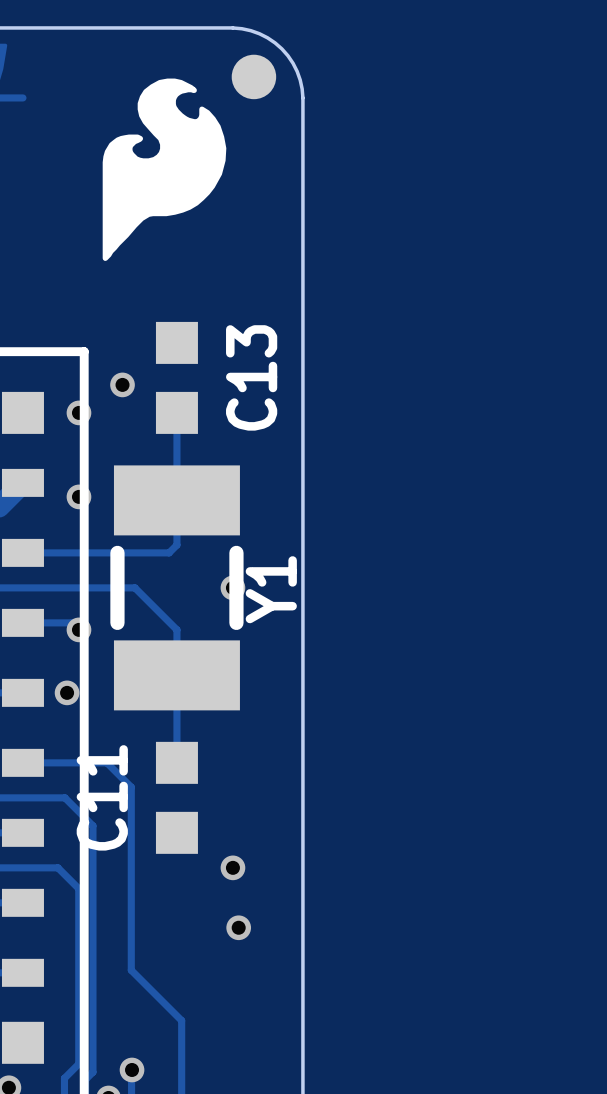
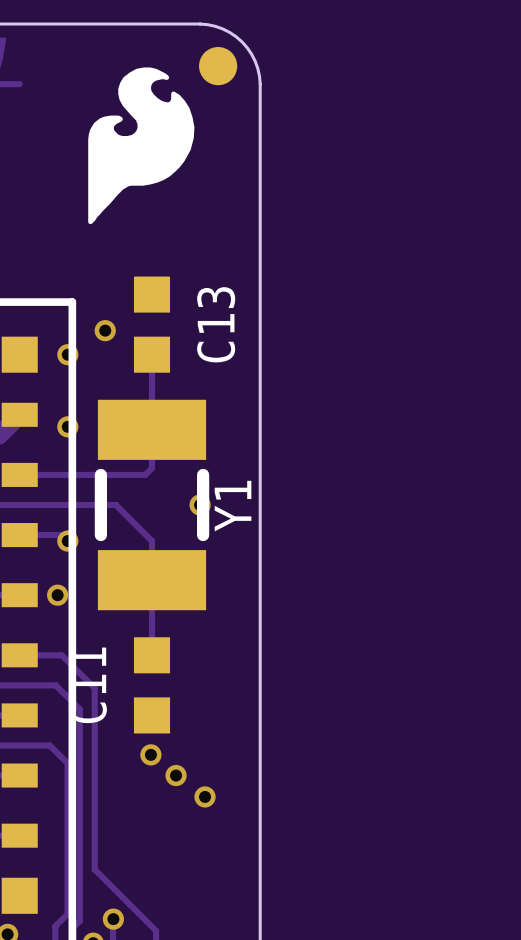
track: (71, 762) (106, 762) (131, 787) (131, 970) (181, 1020) (181, 1083) -> (61, 655) (94, 688) (94, 869) (156, 930)
via: (232, 867) -> none
via: none -> (150, 754)
via: none -> (176, 775)

